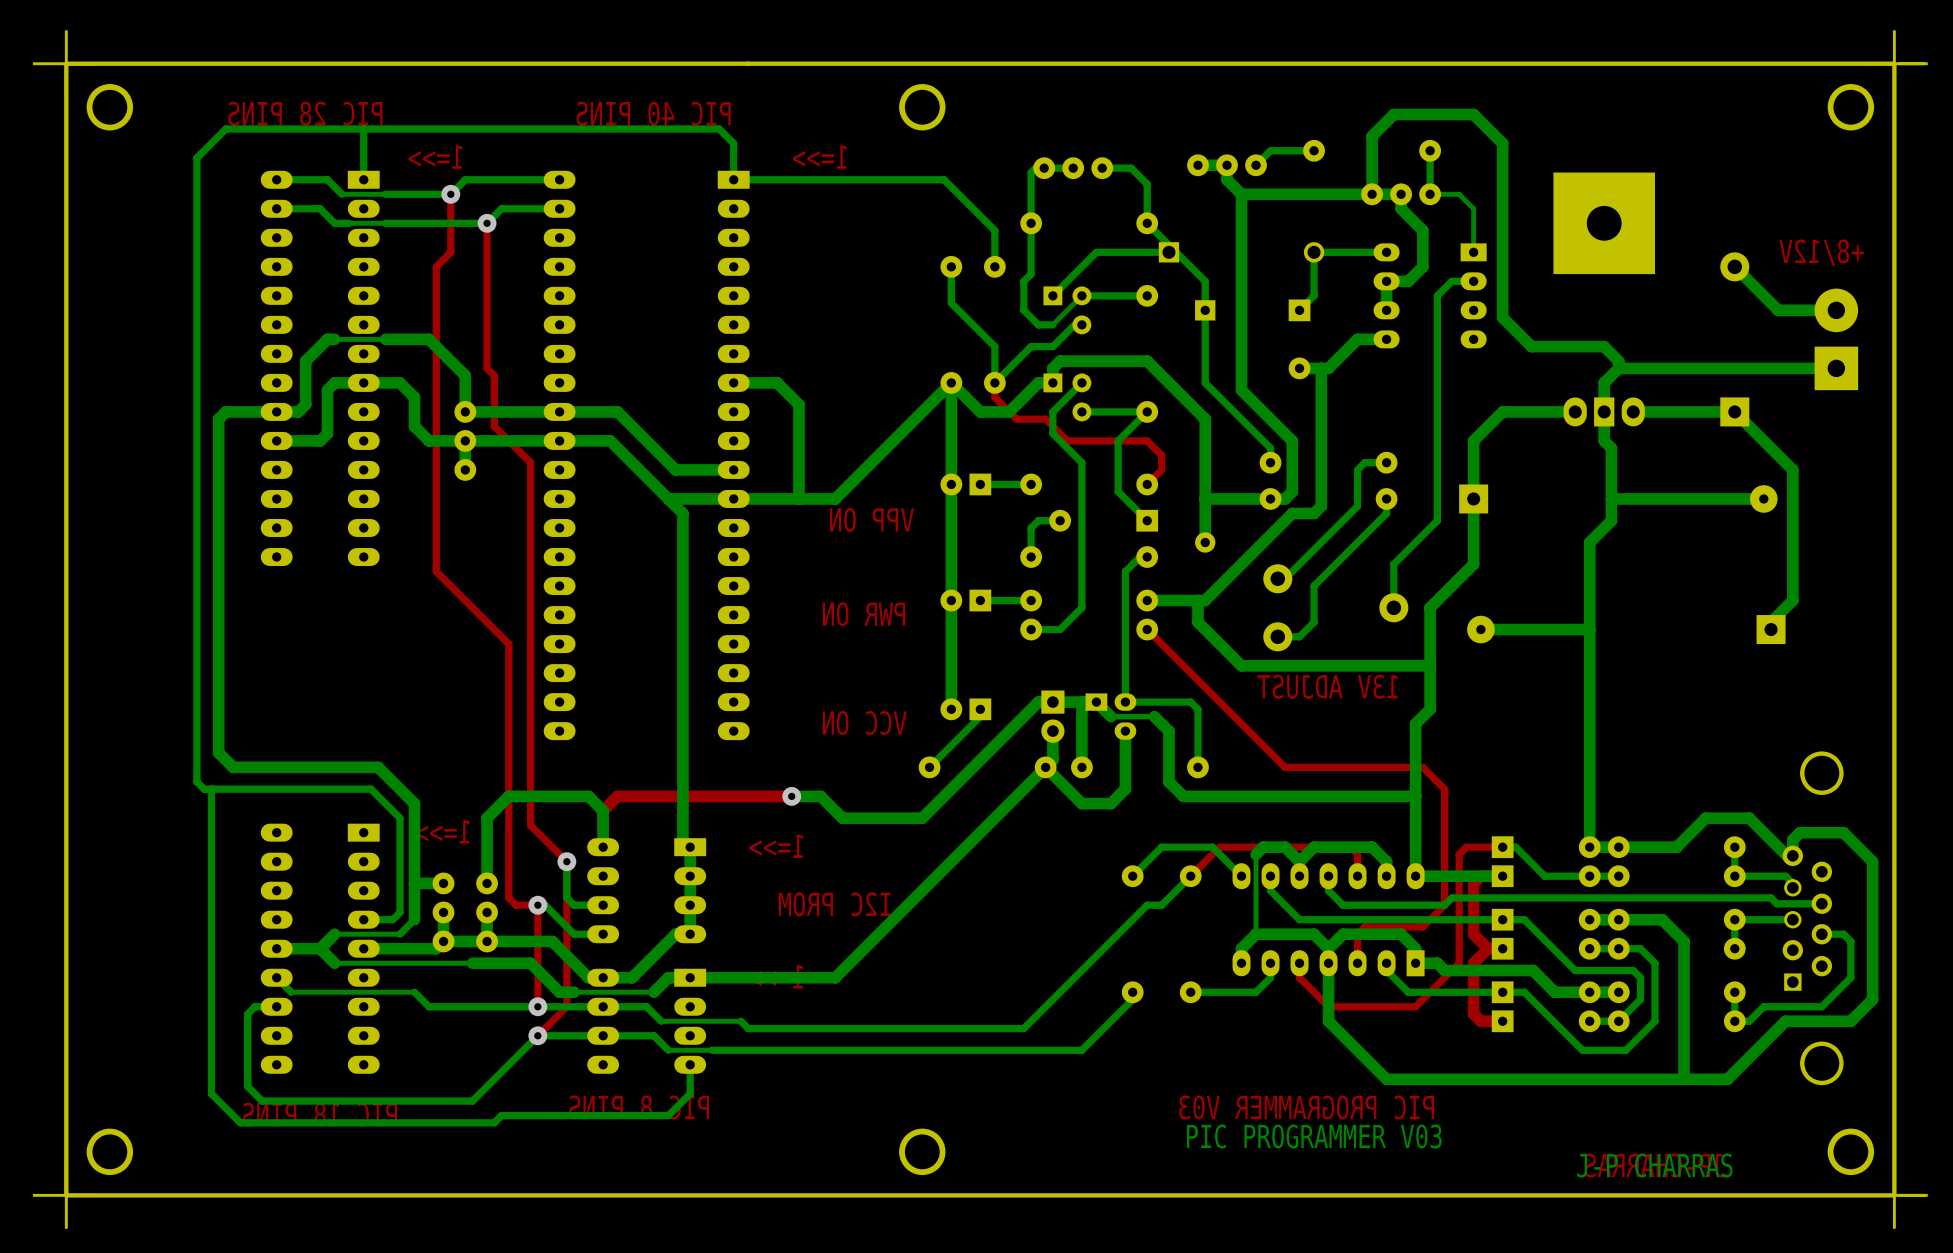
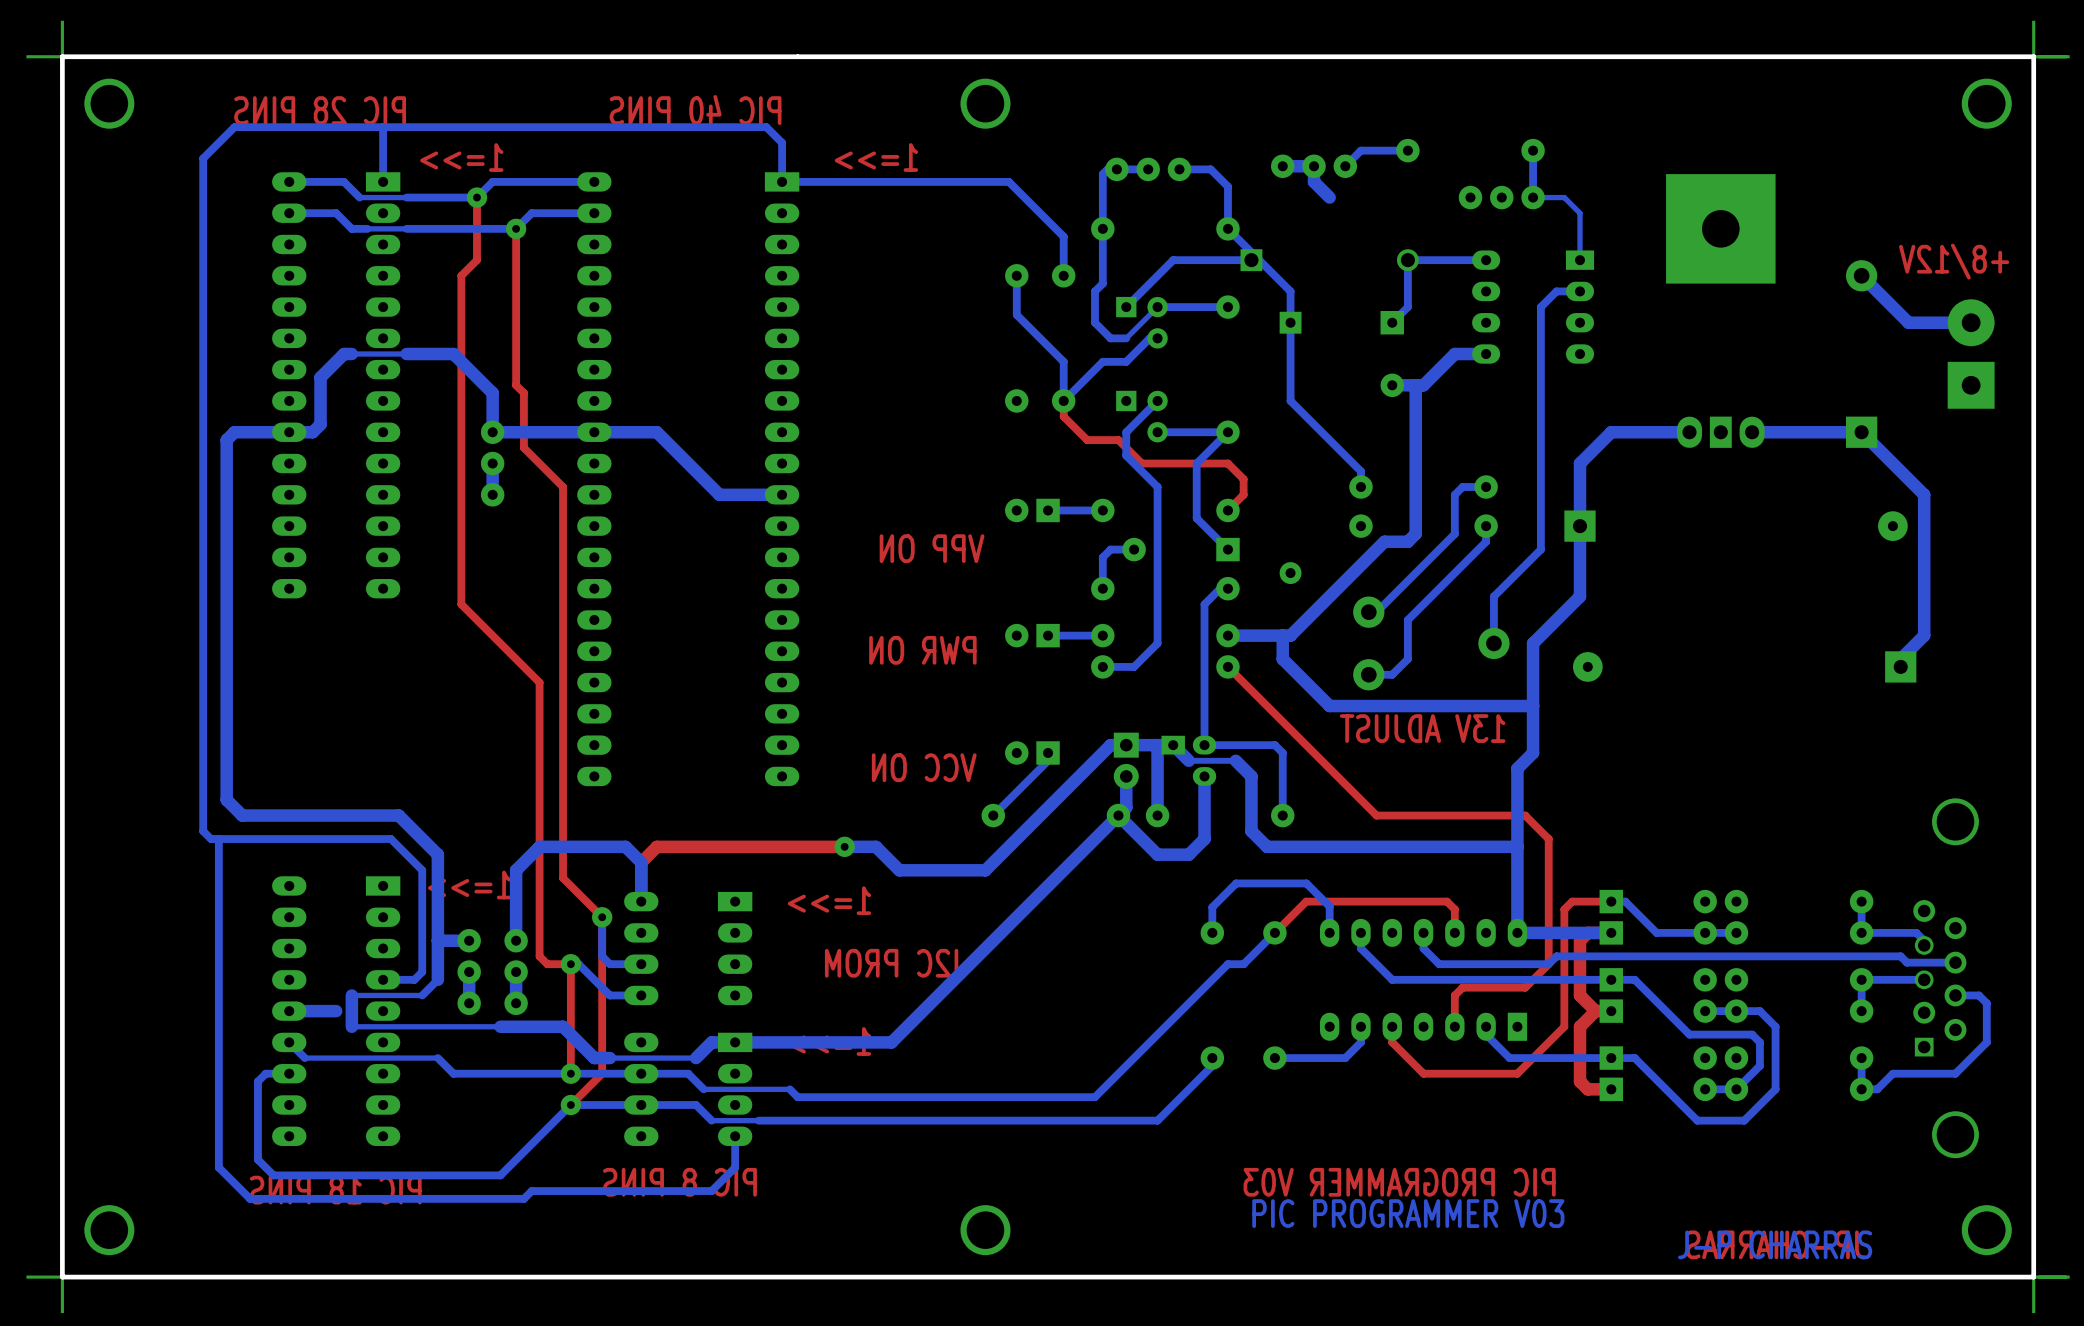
bottom track: (1372, 194) (1372, 136) (1393, 114) (1473, 114) (1502, 143) (1502, 317) (1531, 346) (1604, 346) (1618, 361) (1618, 368) -> none
bottom track: (1386, 310) (1386, 281) (1408, 281) (1422, 266) (1422, 230) (1401, 208) (1401, 194) (1241, 194) (1241, 390) (1292, 440) (1292, 491) (1285, 498) (1205, 498) -> none
bottom track: (1618, 368) (1604, 382) (1604, 440) (1611, 448) (1611, 520) (1589, 542) (1589, 847) (1676, 847) (1705, 818) (1749, 818) (1787, 855) (1792, 855) (1792, 839) (1800, 832) (1843, 832) (1872, 861) (1872, 999) (1850, 1021) (1785, 1021) (1727, 1079) (1386, 1079) (1328, 1021) (1328, 948) -> none
bottom track: (1836, 368) (1618, 368) -> none
bottom track: (733, 382) (777, 382) (799, 404) (799, 498) -> none
bottom track: (951, 382) (951, 709) -> none
bottom track: (951, 382) (980, 411) (1009, 411) (1038, 382) (1052, 382) (1052, 368) (1060, 361) (1147, 361) (1205, 419) (1205, 542) -> none
bottom track: (951, 382) (835, 498) (668, 498) -> none
bottom track: (276, 440) (320, 440) (327, 433) (327, 390) (334, 382) (400, 382) (414, 397) (414, 426) (429, 440) (610, 440) (682, 513) (682, 839) (690, 847) (690, 934) (675, 934) (632, 977) (588, 977) (552, 941) (443, 941) (436, 948) (363, 948) -> none
bottom track: (1763, 498) (1611, 498) -> none
bottom track: (1589, 629) (1480, 629) -> none
bottom track: (1299, 861) (1285, 847) (1263, 847) (1256, 854) (1256, 934) -> none
bottom track: (1299, 861) (1314, 847) (1372, 847) (1386, 861) (1386, 876) -> none
bottom track: (1241, 876) (1212, 847) (1161, 847) (1132, 876) -> (1329, 932) (1329, 906) (1306, 883) (1236, 883) (1212, 907) (1212, 932)
bottom track: (1589, 919) (1662, 919) (1684, 941) (1684, 1079) -> none
bottom track: (334, 934) (320, 948) (334, 963) -> (351, 995) (351, 1026)
bottom track: (1256, 934) (1241, 948) (1241, 963) -> none
bottom track: (1256, 934) (1314, 934) (1328, 948) -> none
bottom track: (1328, 948) (1343, 934) (1401, 934) (1415, 948) (1415, 963) (1437, 963) (1444, 970) (1533, 970) (1554, 992) (1618, 992) -> none

